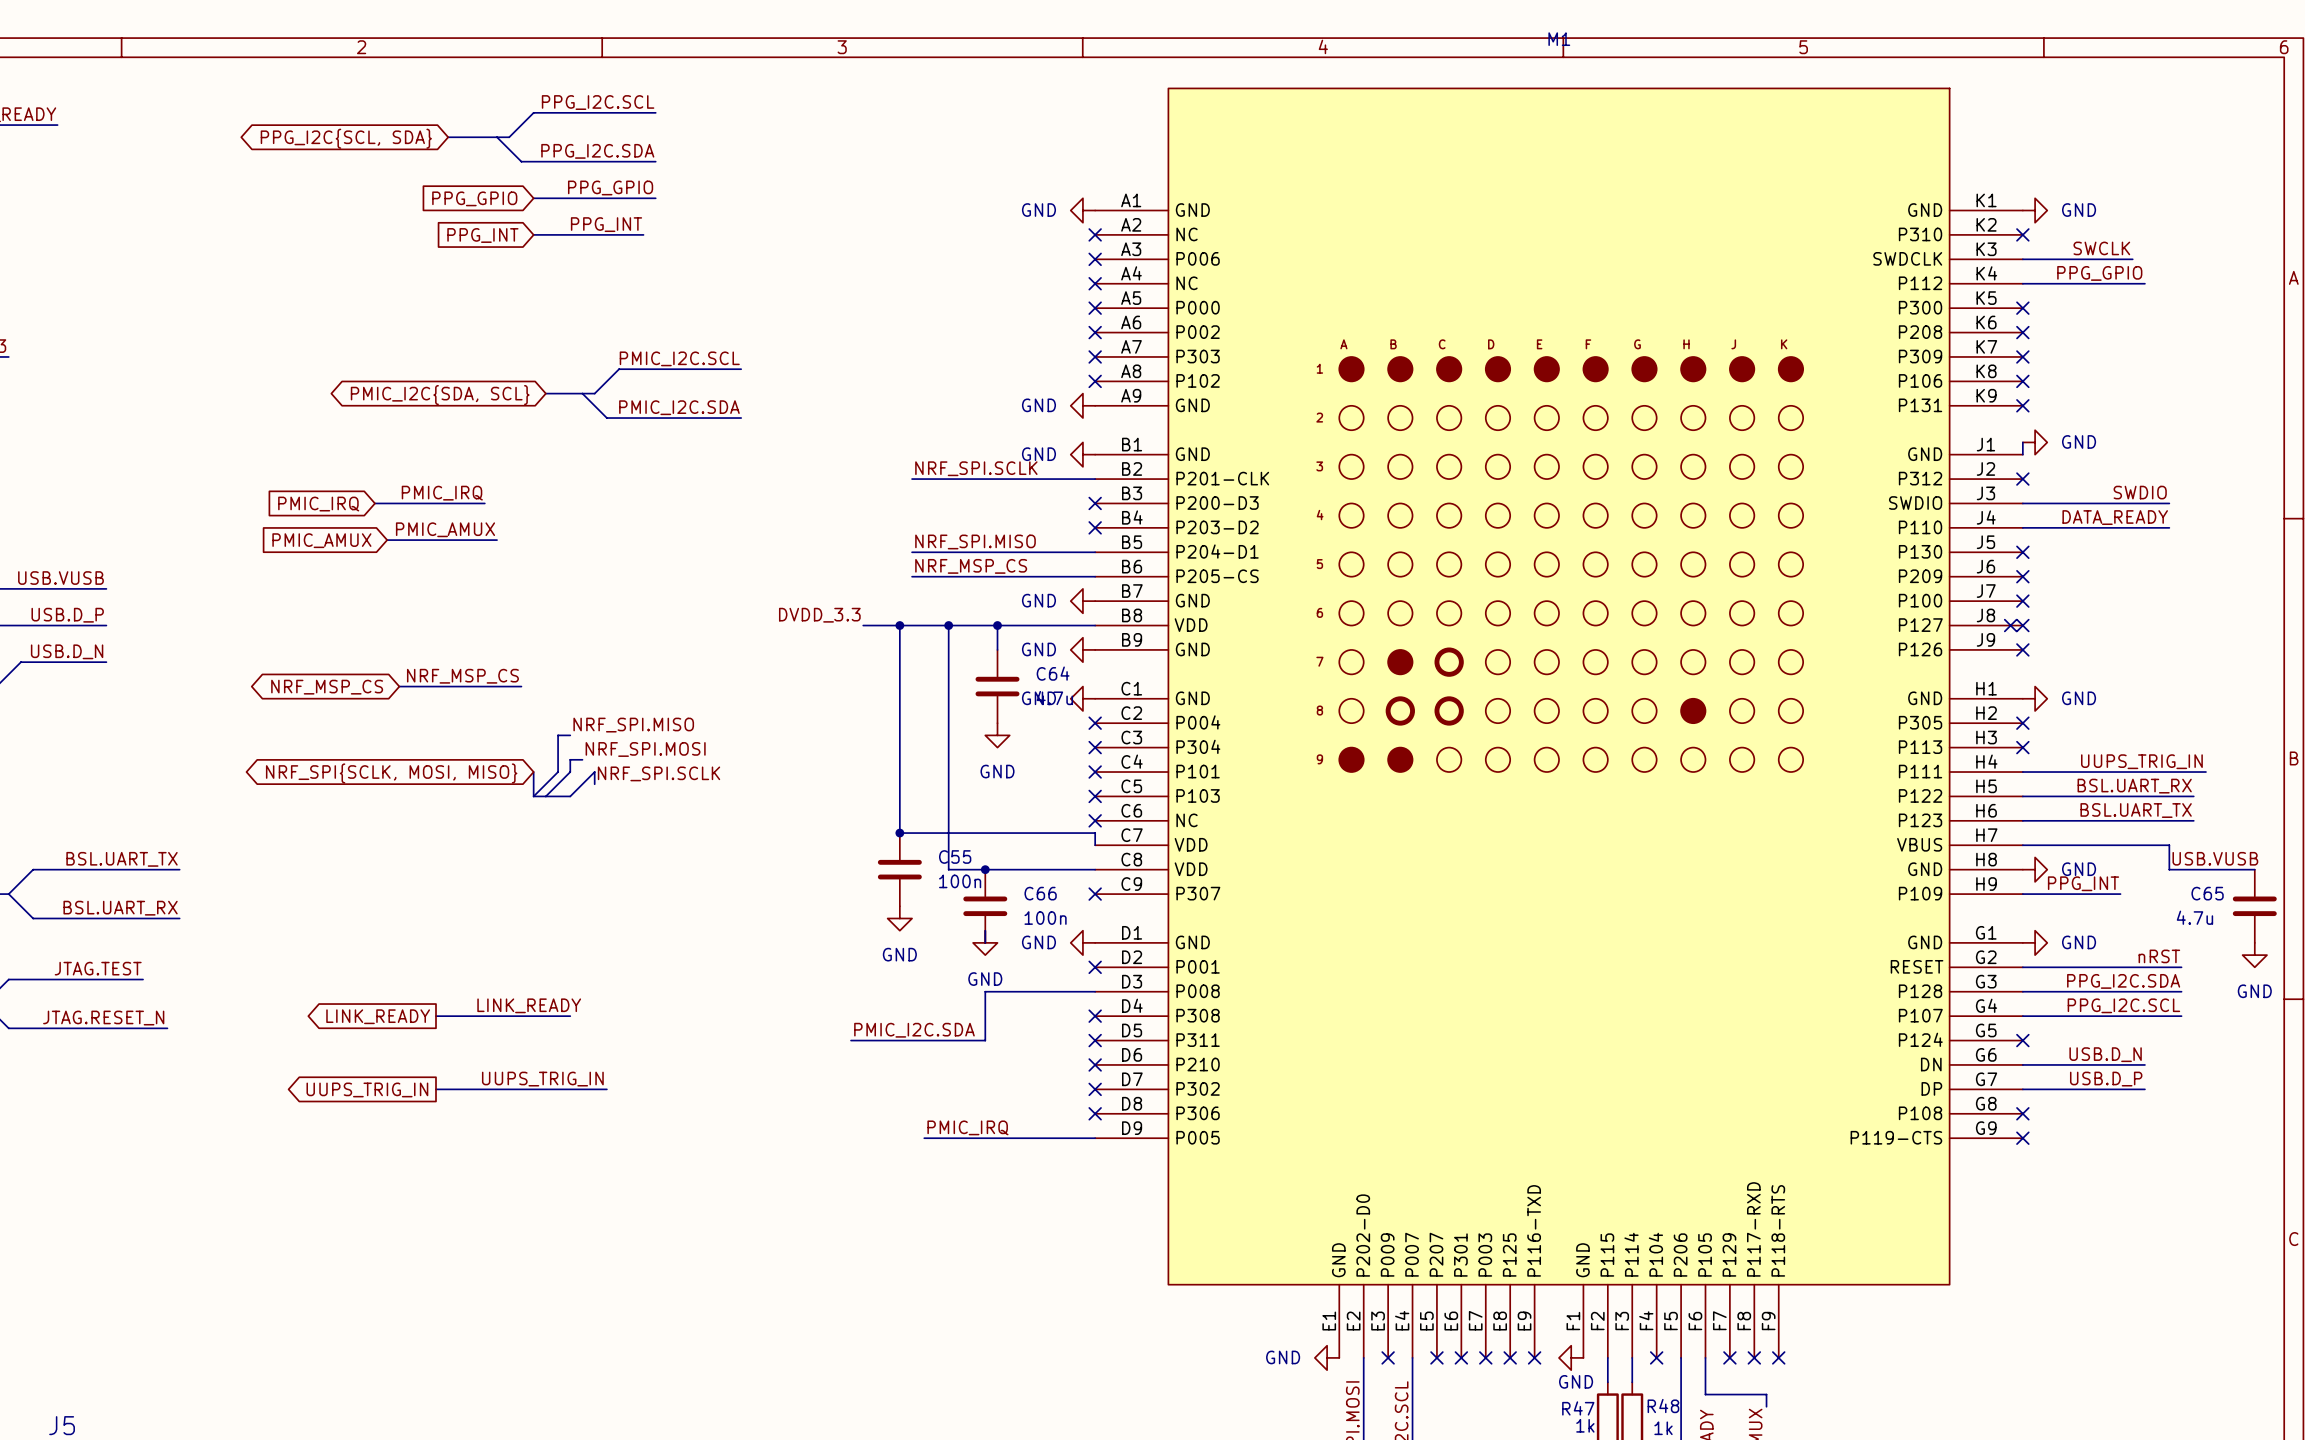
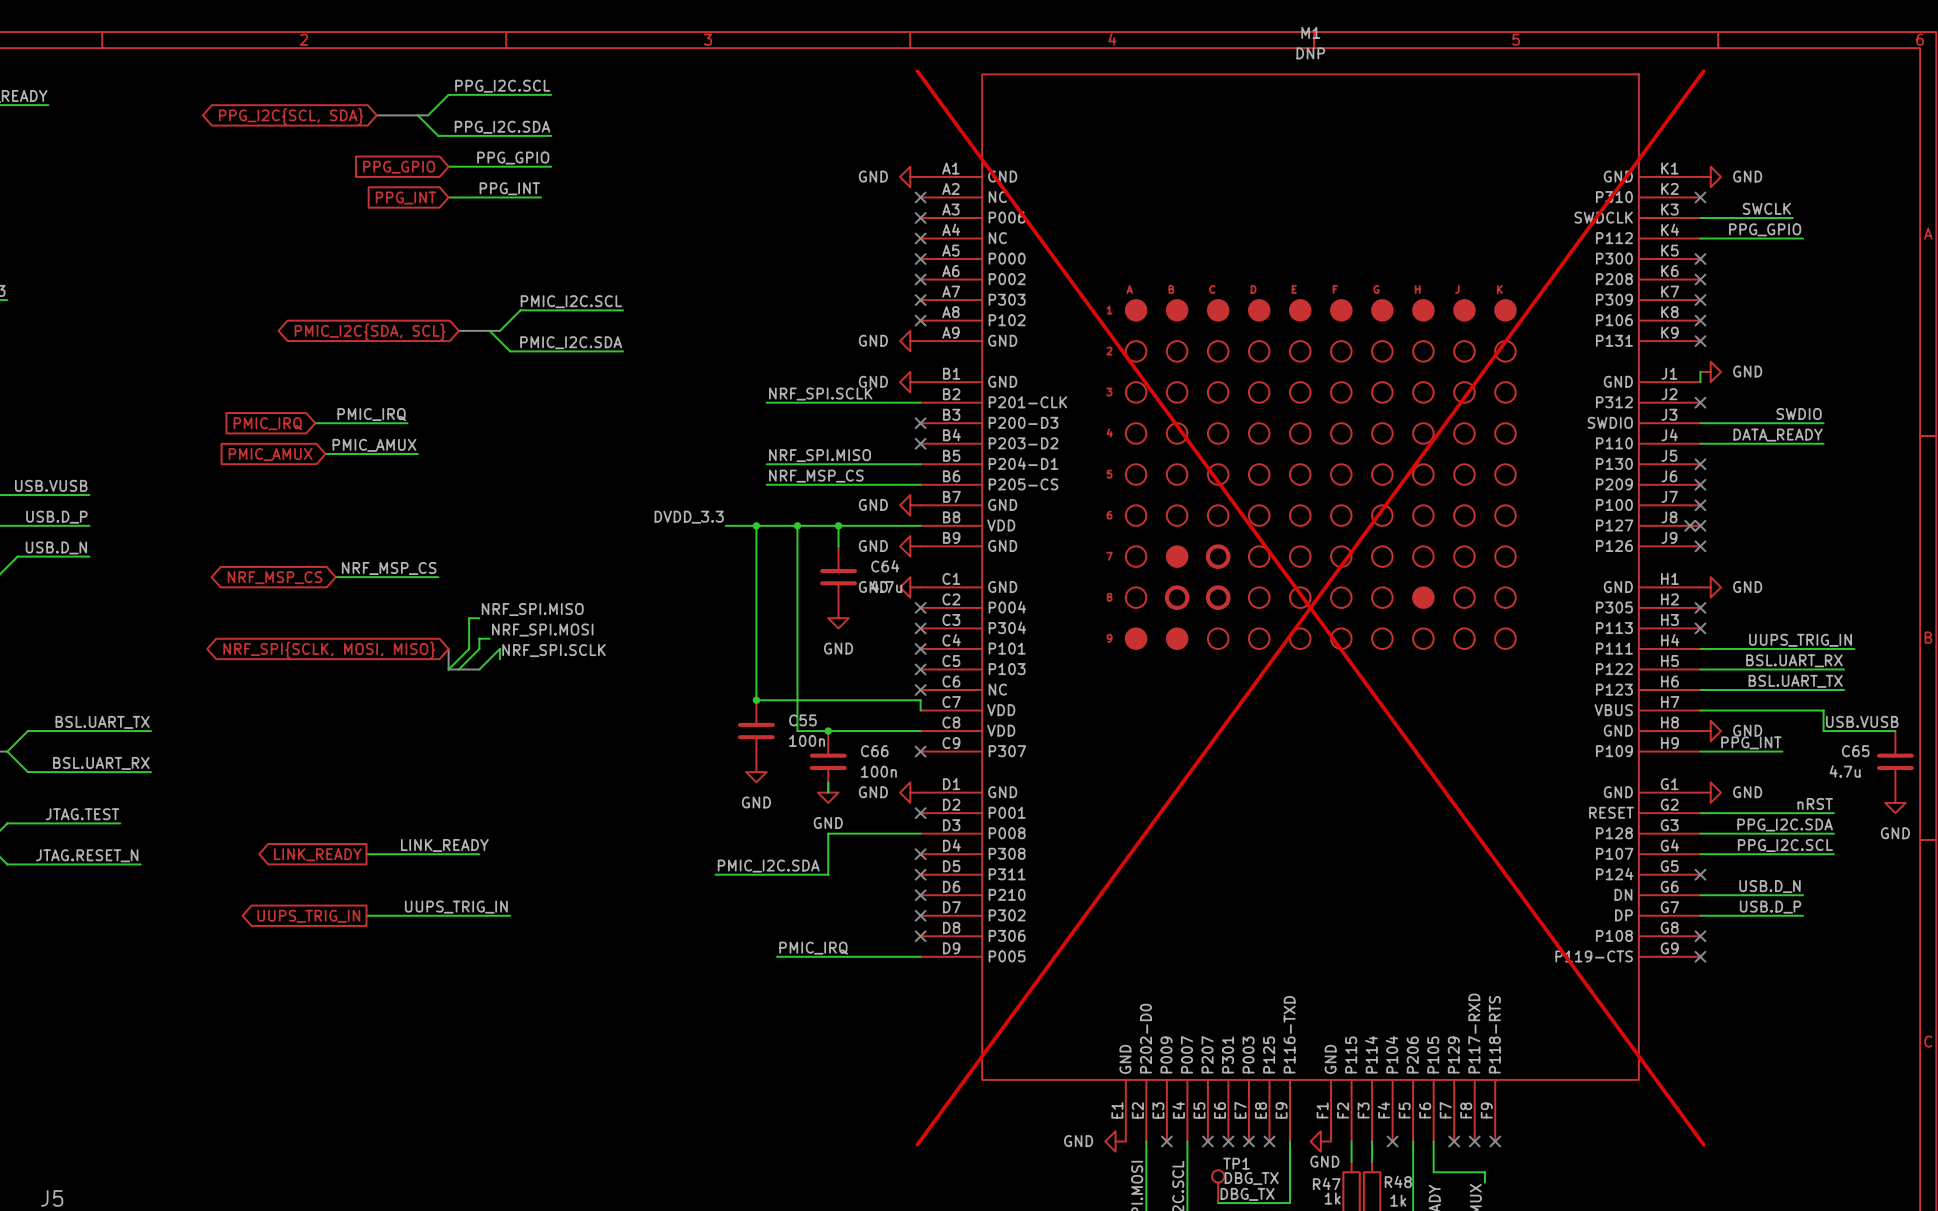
M1 value: none -> DNP (1310, 53)
M1 do-not-place cross: none -> (1310, 607)
wire: none -> (1290, 1141) (1290, 1203) (1218, 1203)
no-connect mark: (1534, 1357) -> none
TP1: none -> DBG_TX (1218, 1186)
label: none -> DBG_TX (1247, 1194)

